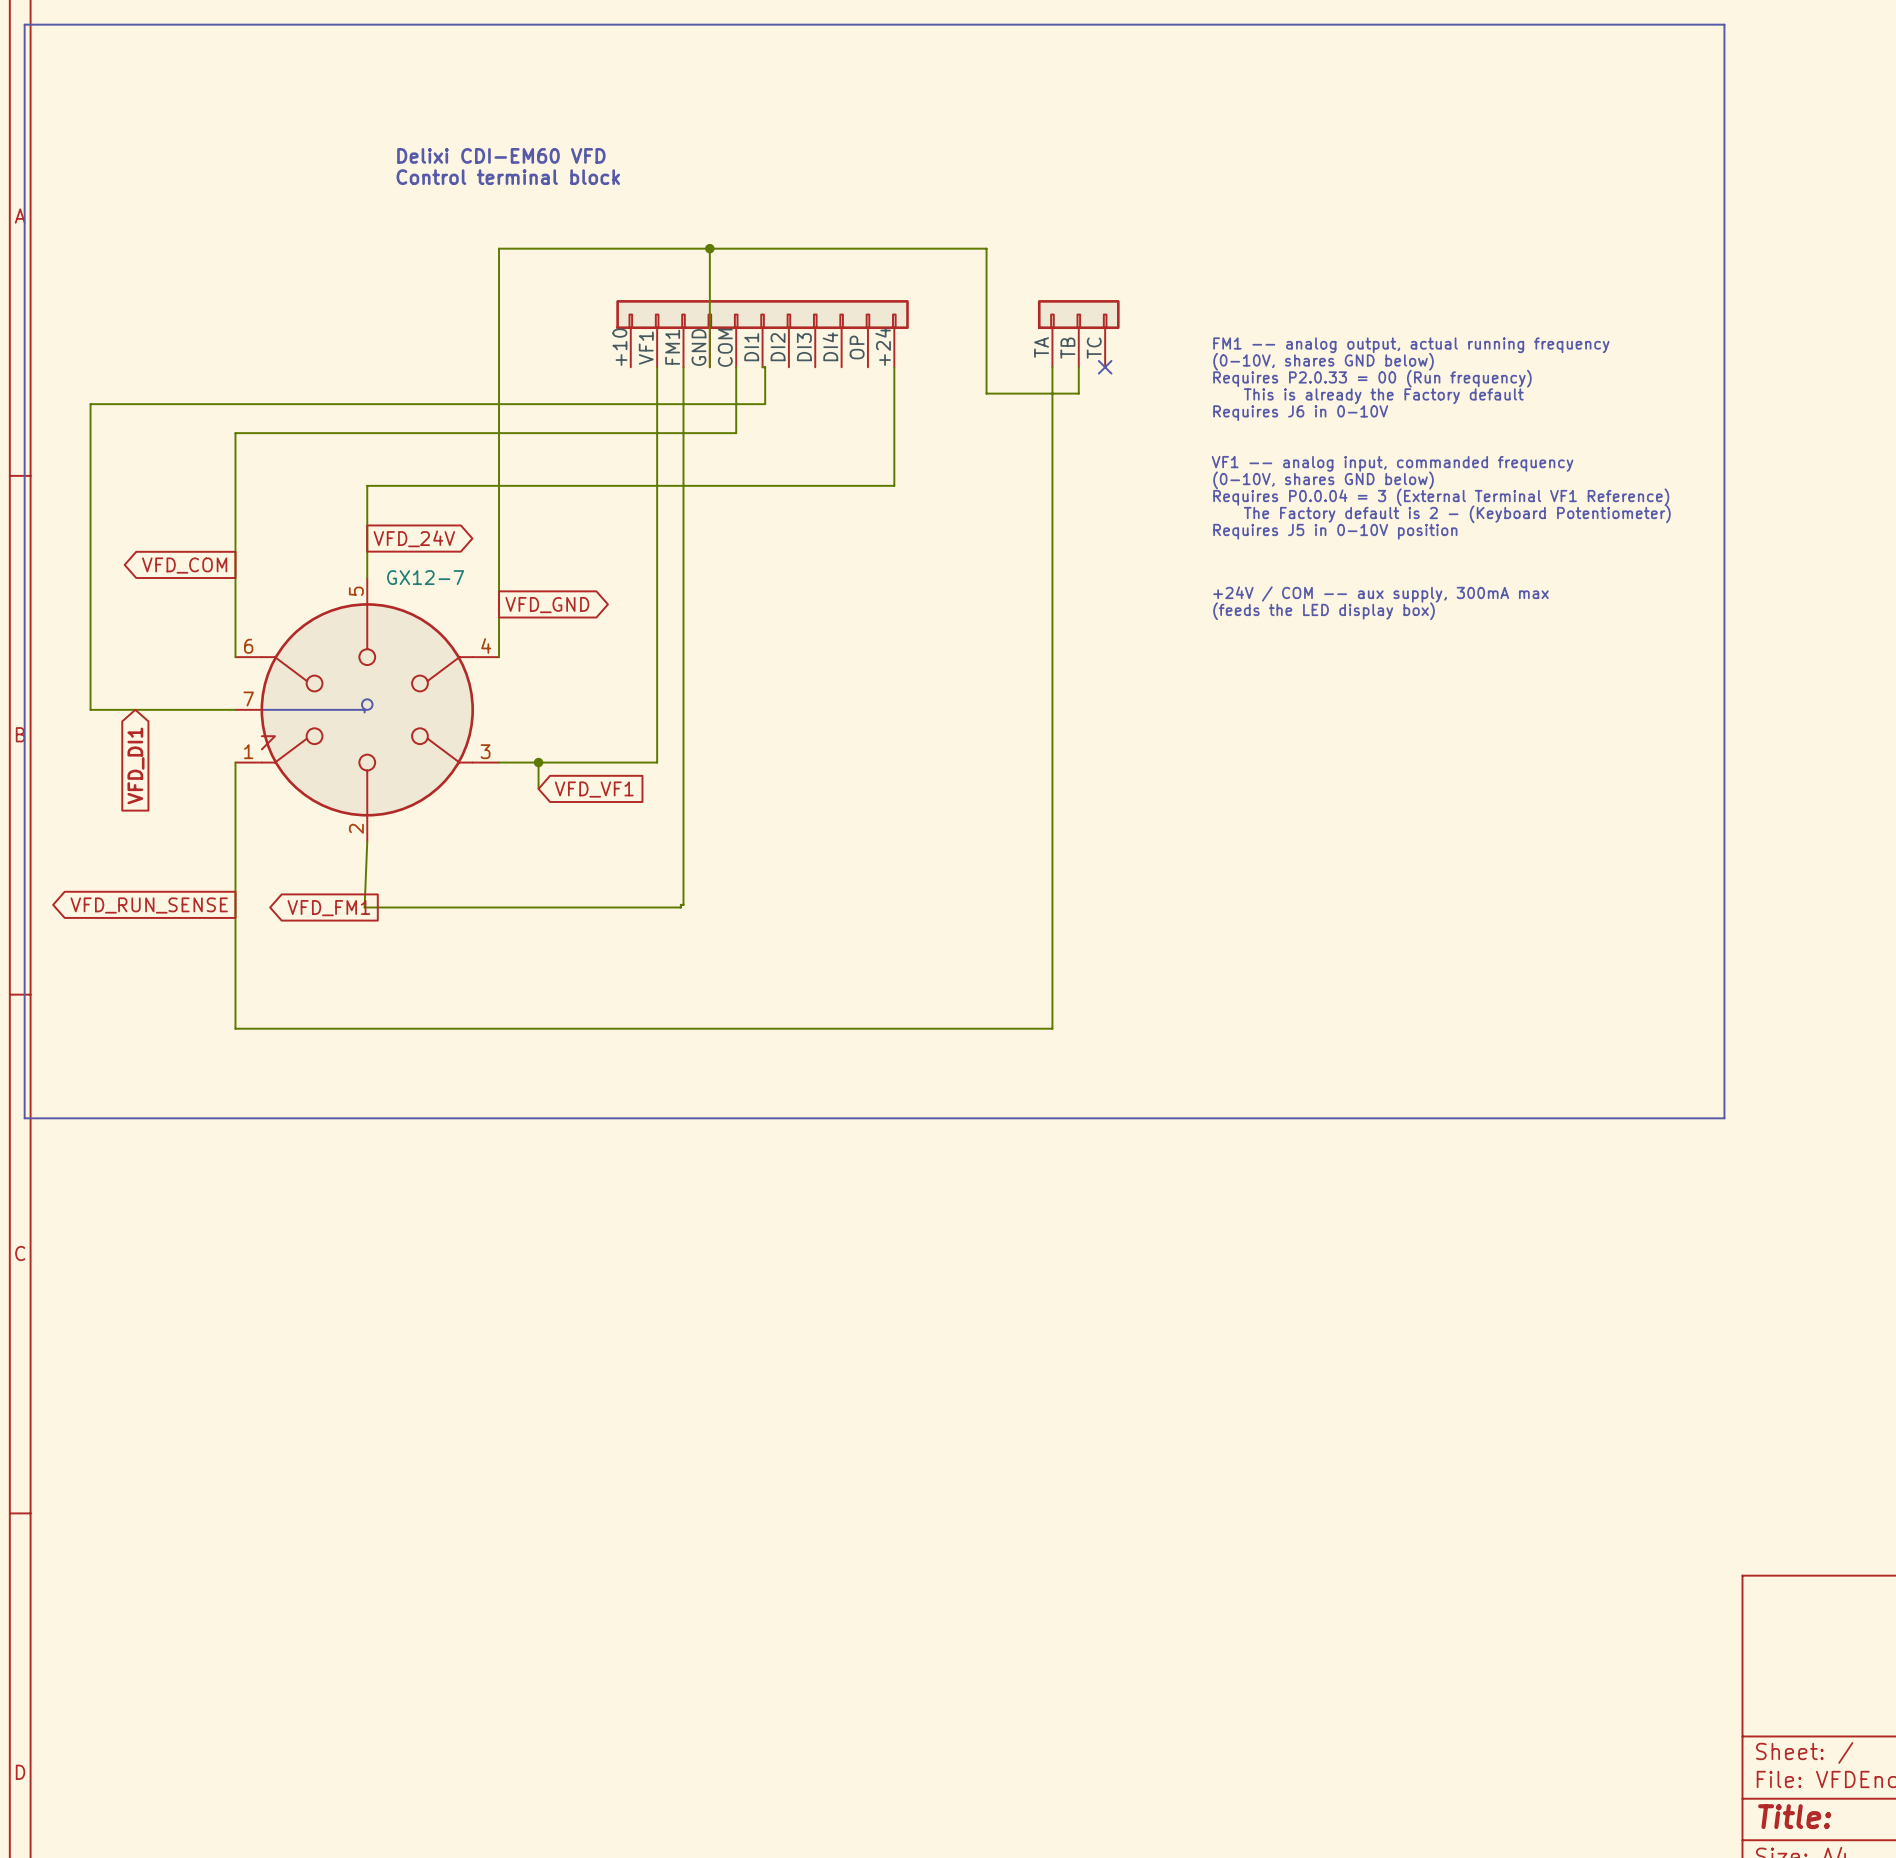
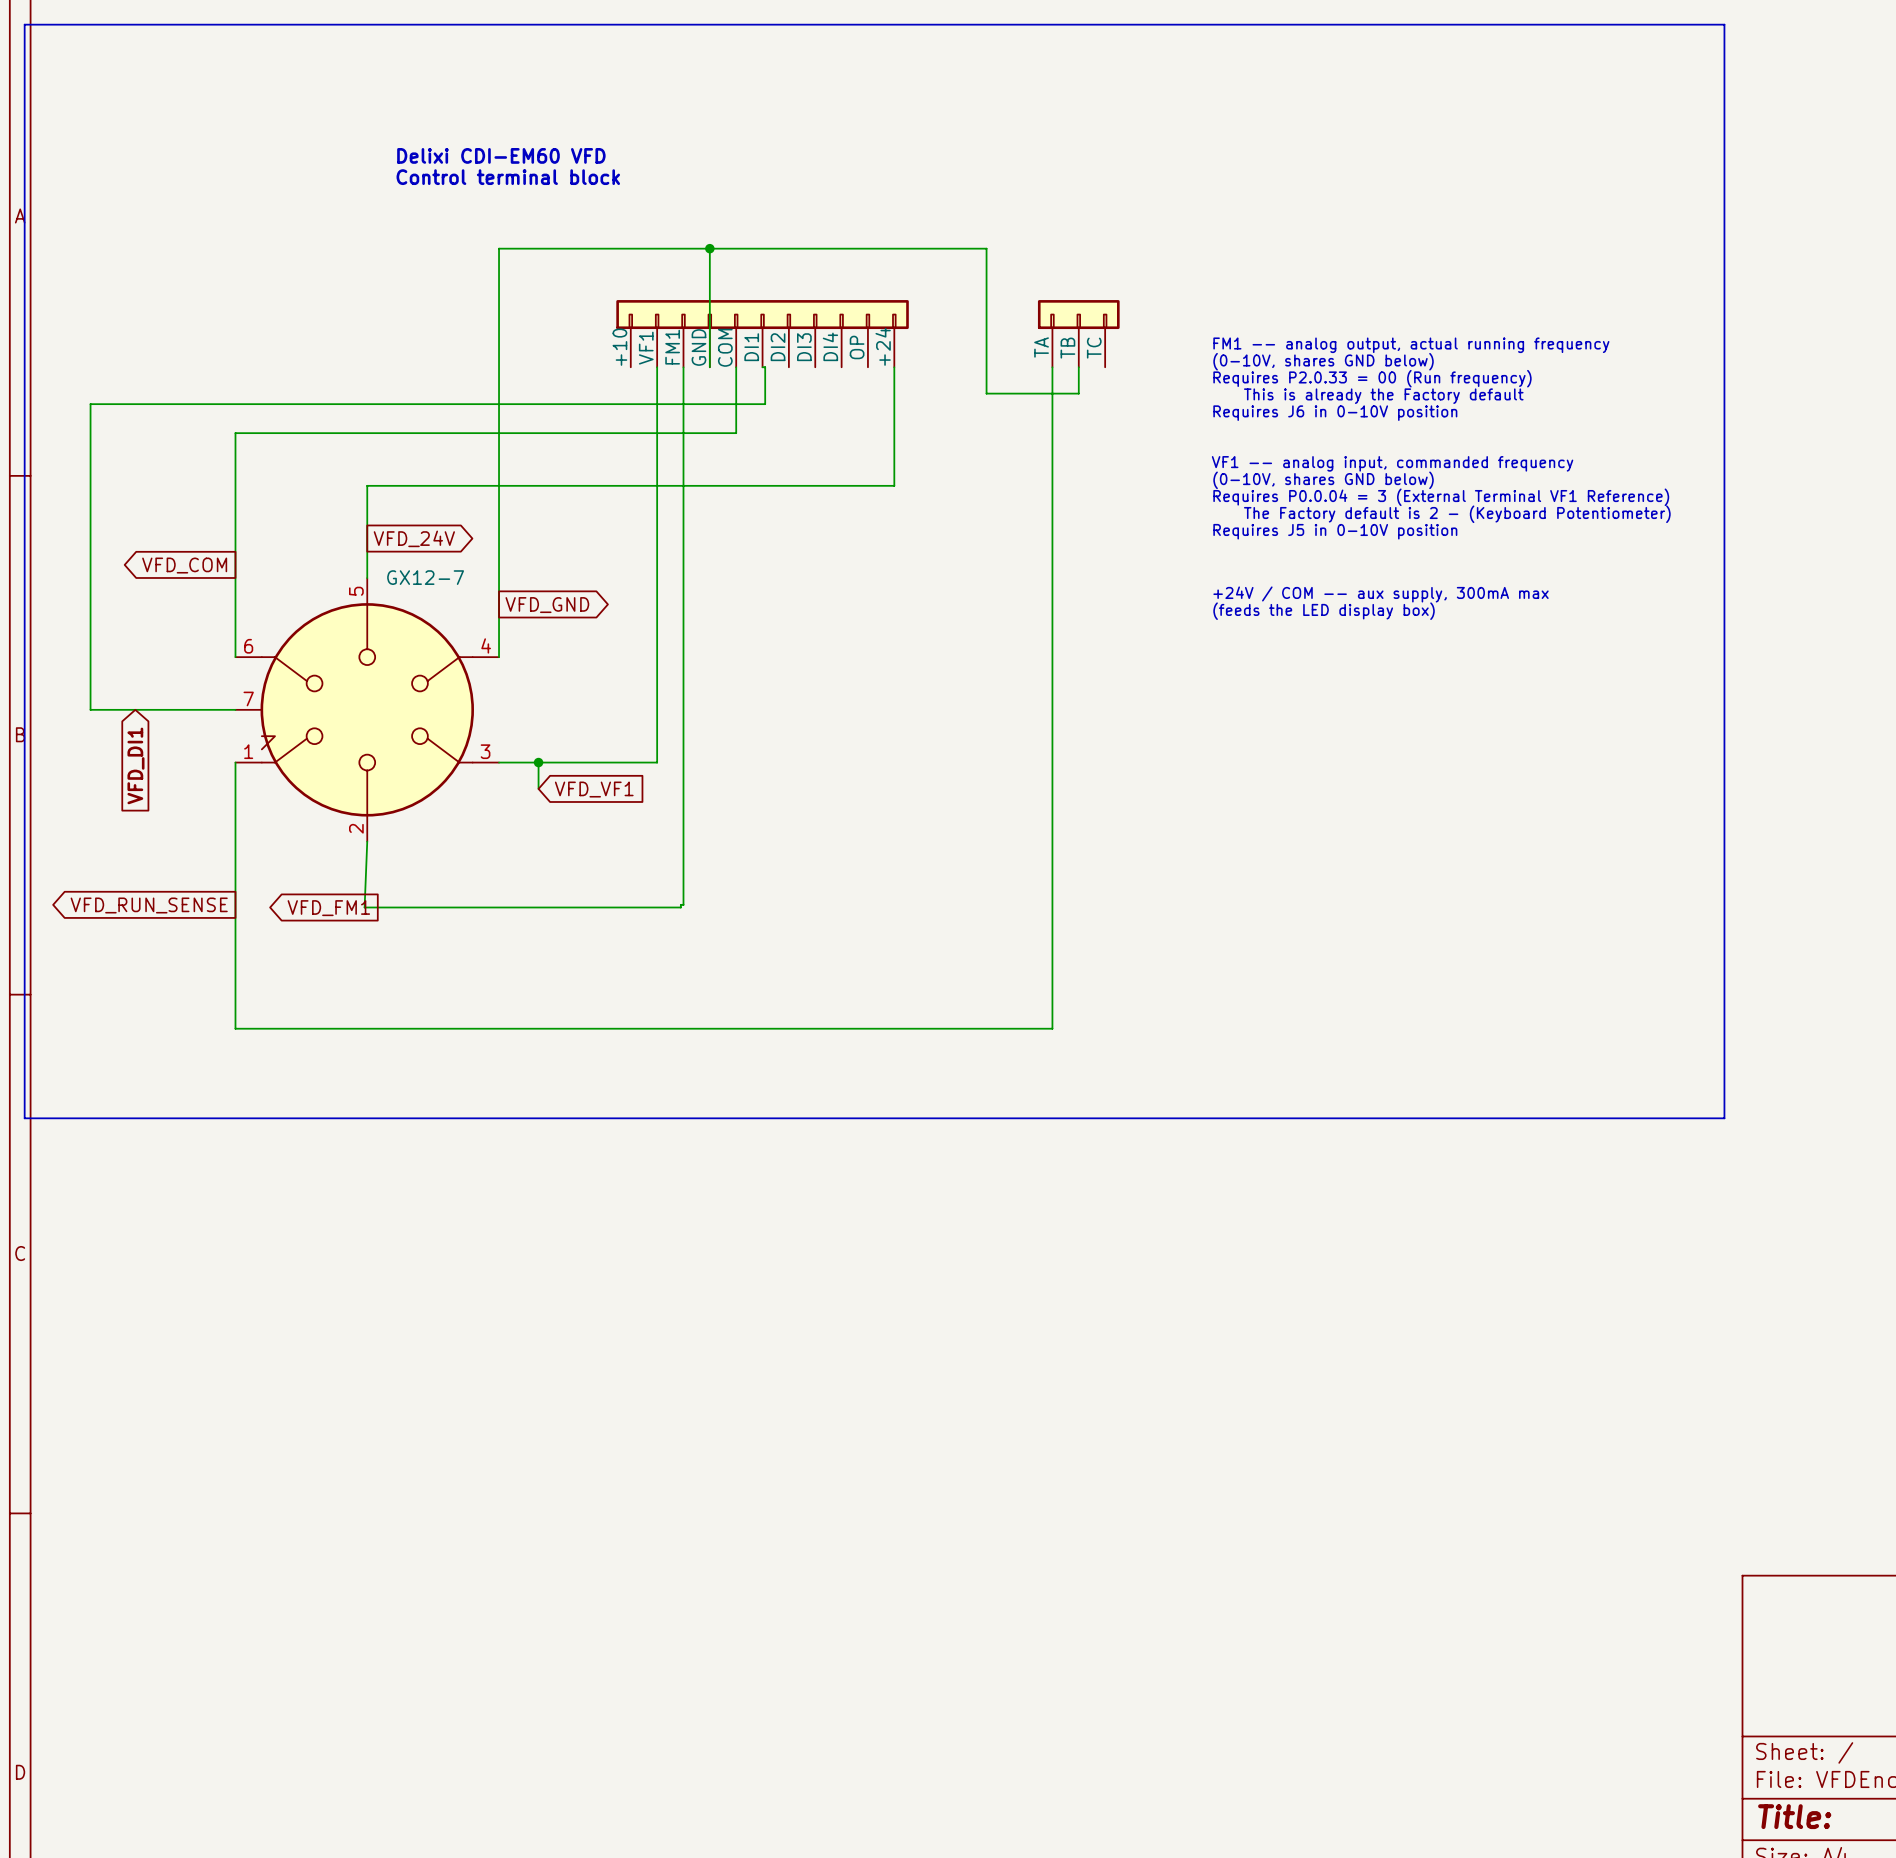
no-connect mark: (1105, 367) -> none
text: Requires J6 in 0-10V (1300, 413) -> Requires J6 in 0-10V position (1335, 413)
drawing: [361, 699, 373, 710] -> none
line: (261, 709) (364, 709) (364, 712) -> none

